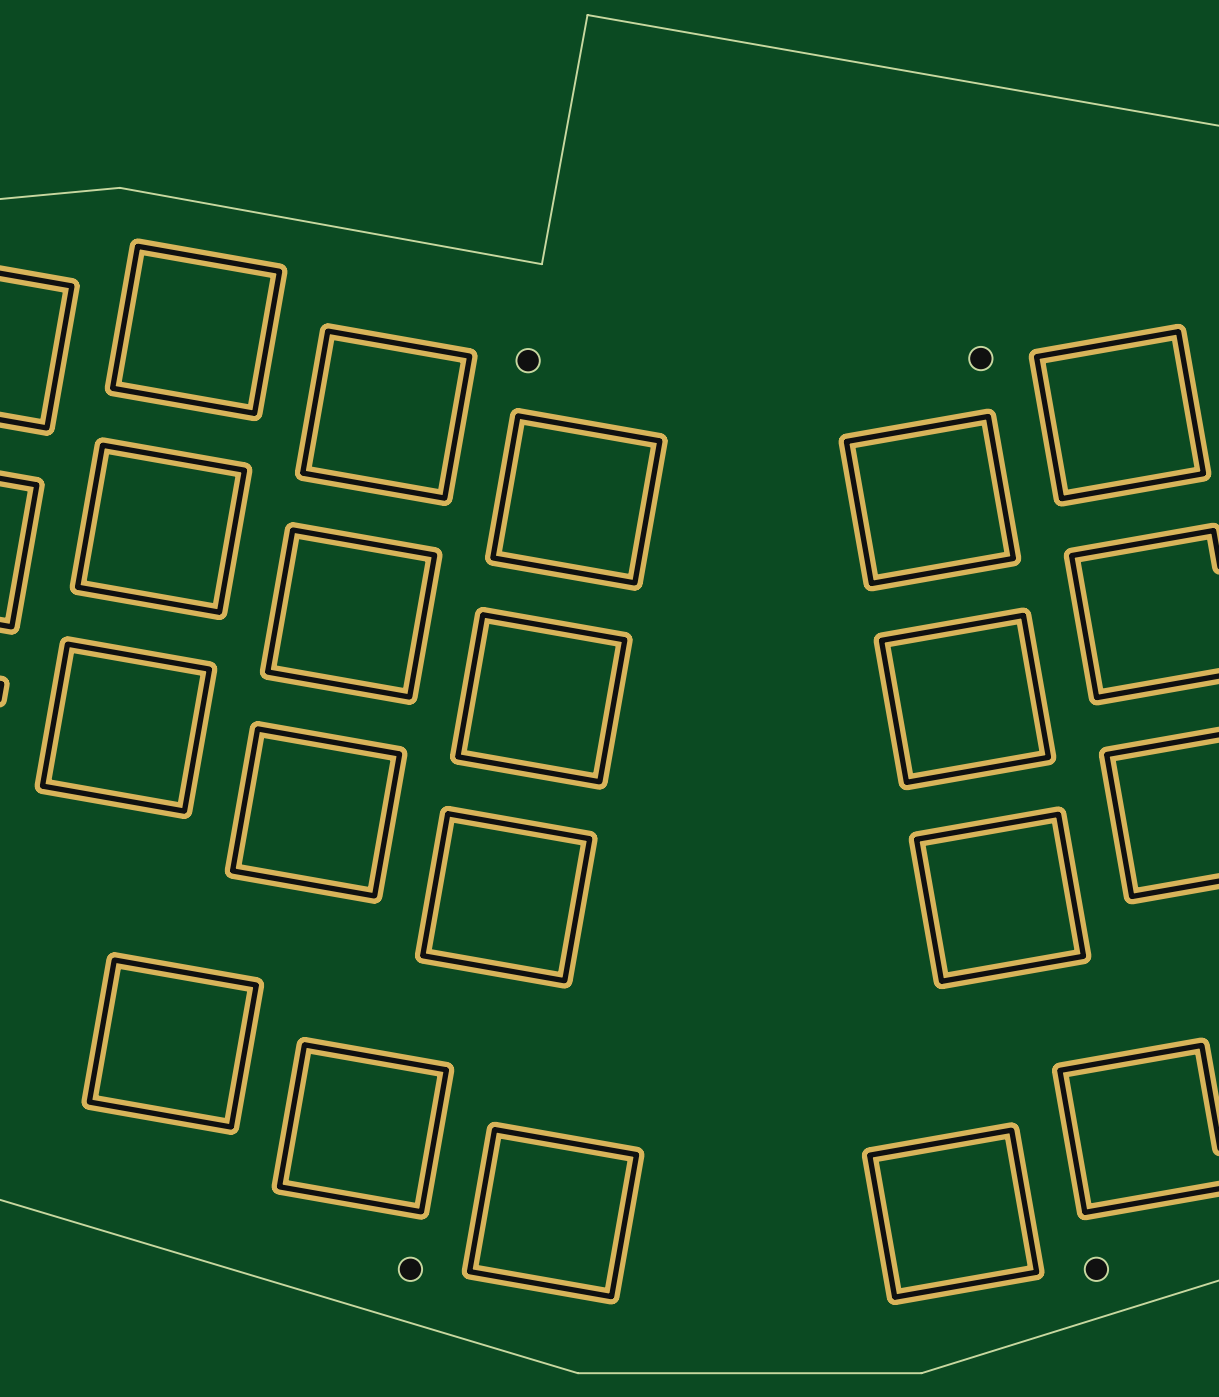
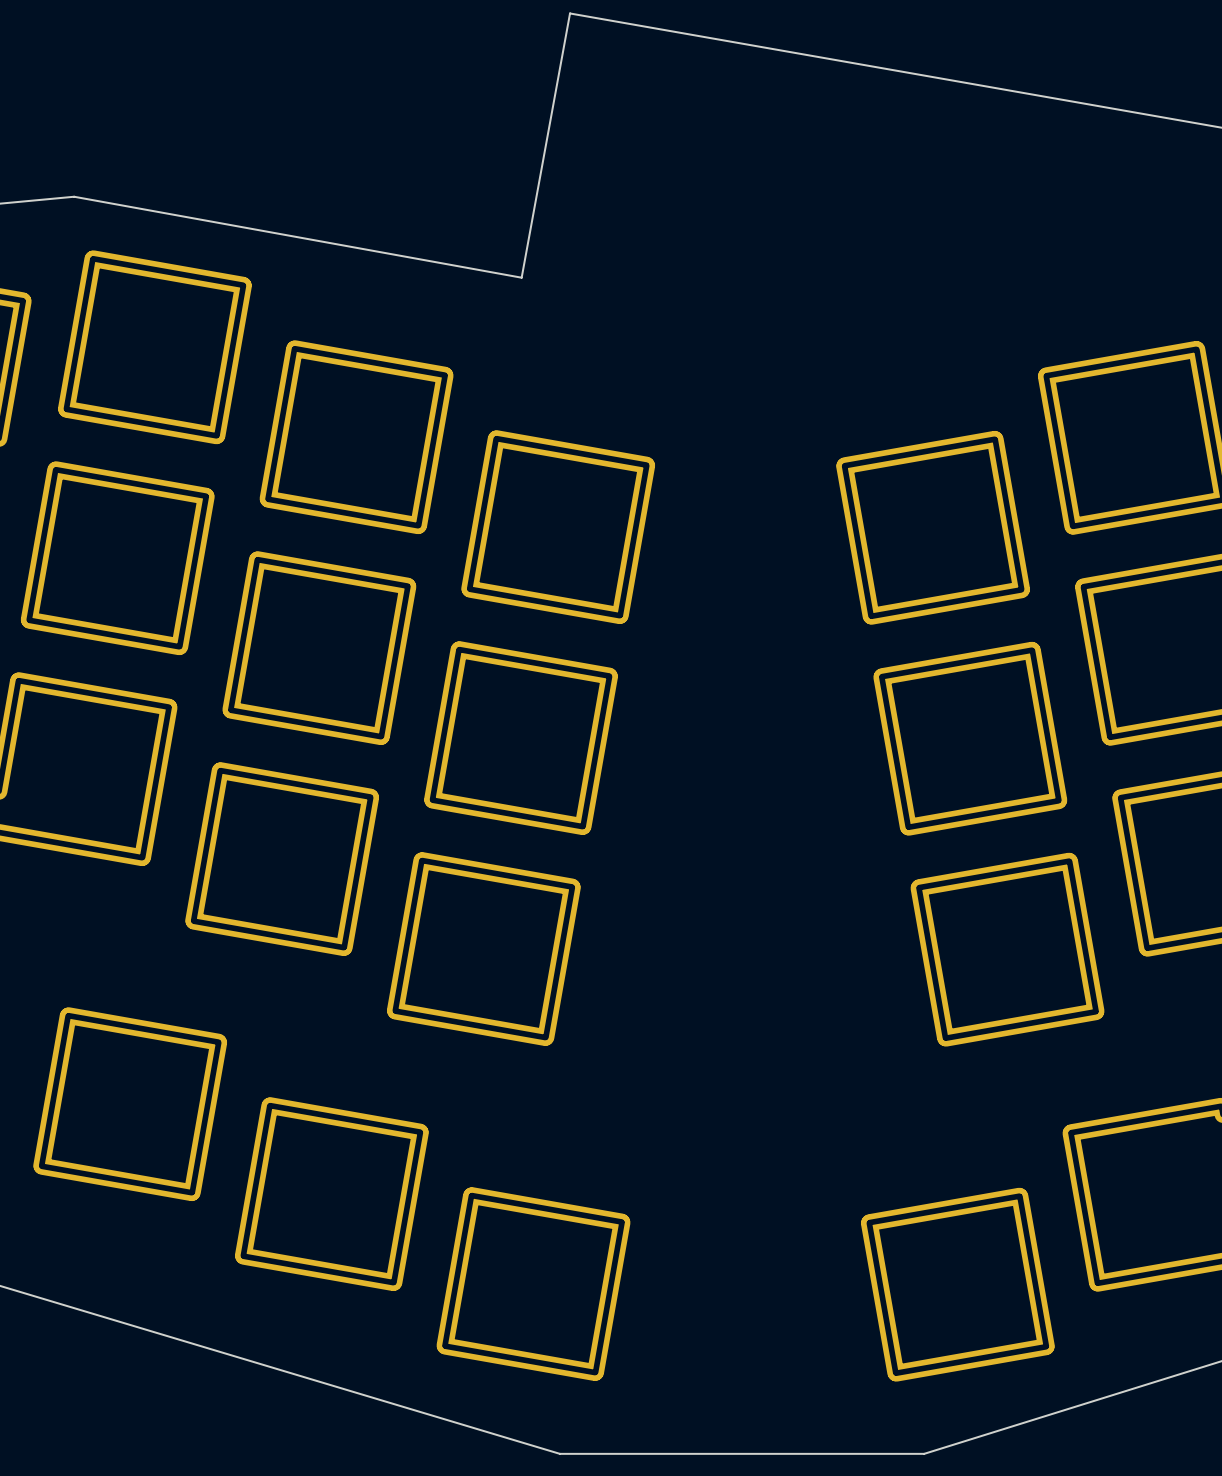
part: (980, 358) -> none
part: (528, 360) -> none
part: (410, 1269) -> none
part: (1096, 1269) -> none

